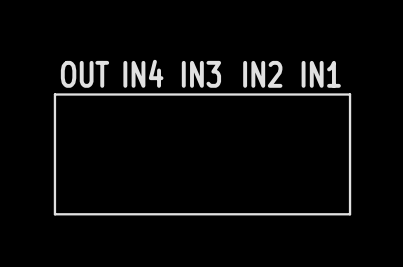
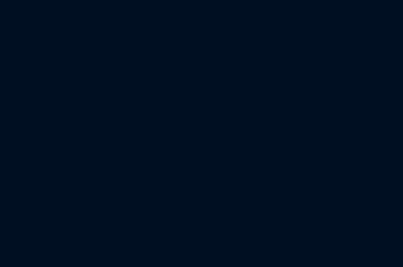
text: IN4 (143, 73) -> none
text: OUT (84, 74) -> none
text: IN3 (201, 74) -> none
text: IN2 (262, 74) -> none
text: IN1 (321, 74) -> none
line: (54, 94) (350, 94) (350, 214) (54, 214) (54, 94) -> none

